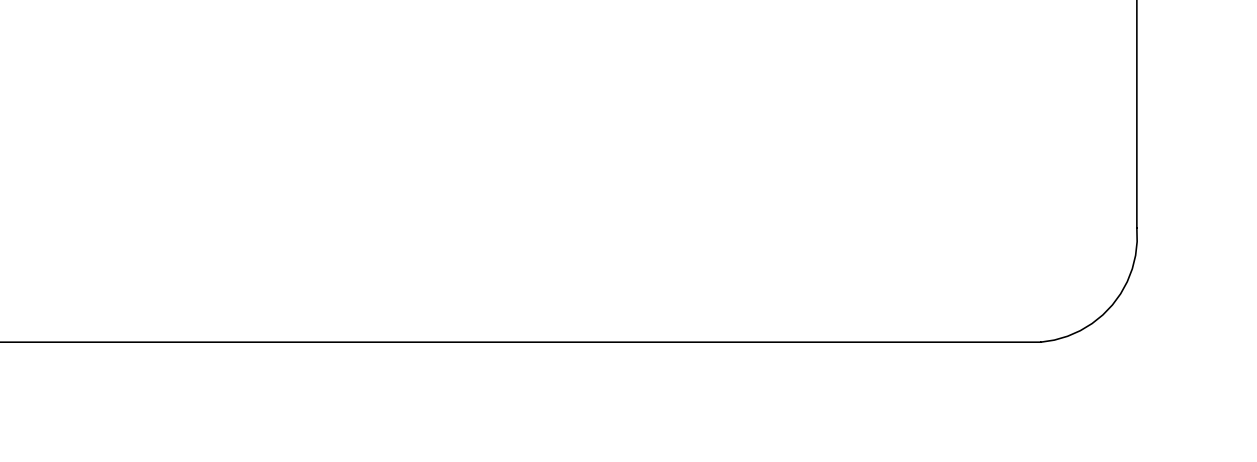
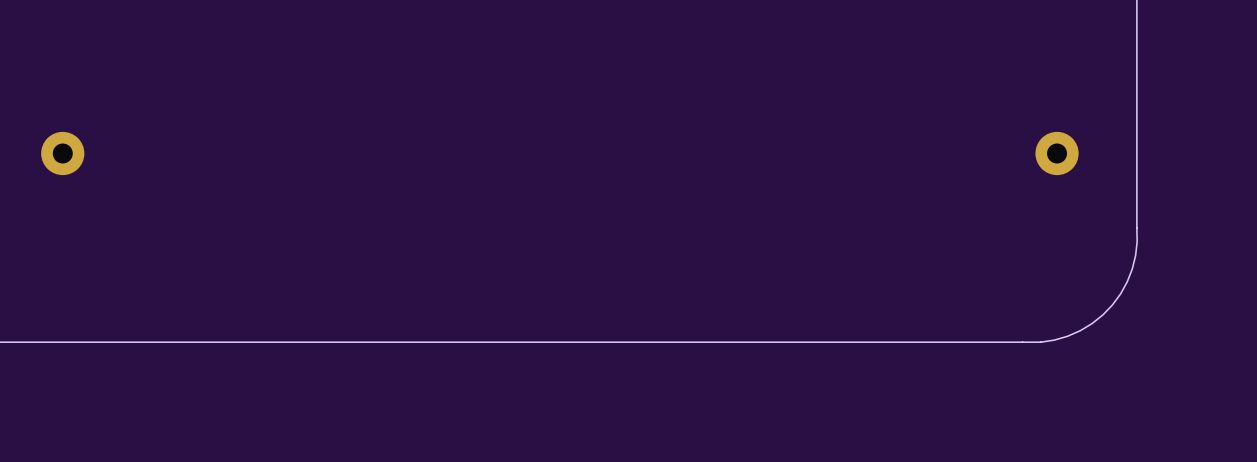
via: none -> (62, 153)
via: none -> (1057, 153)

